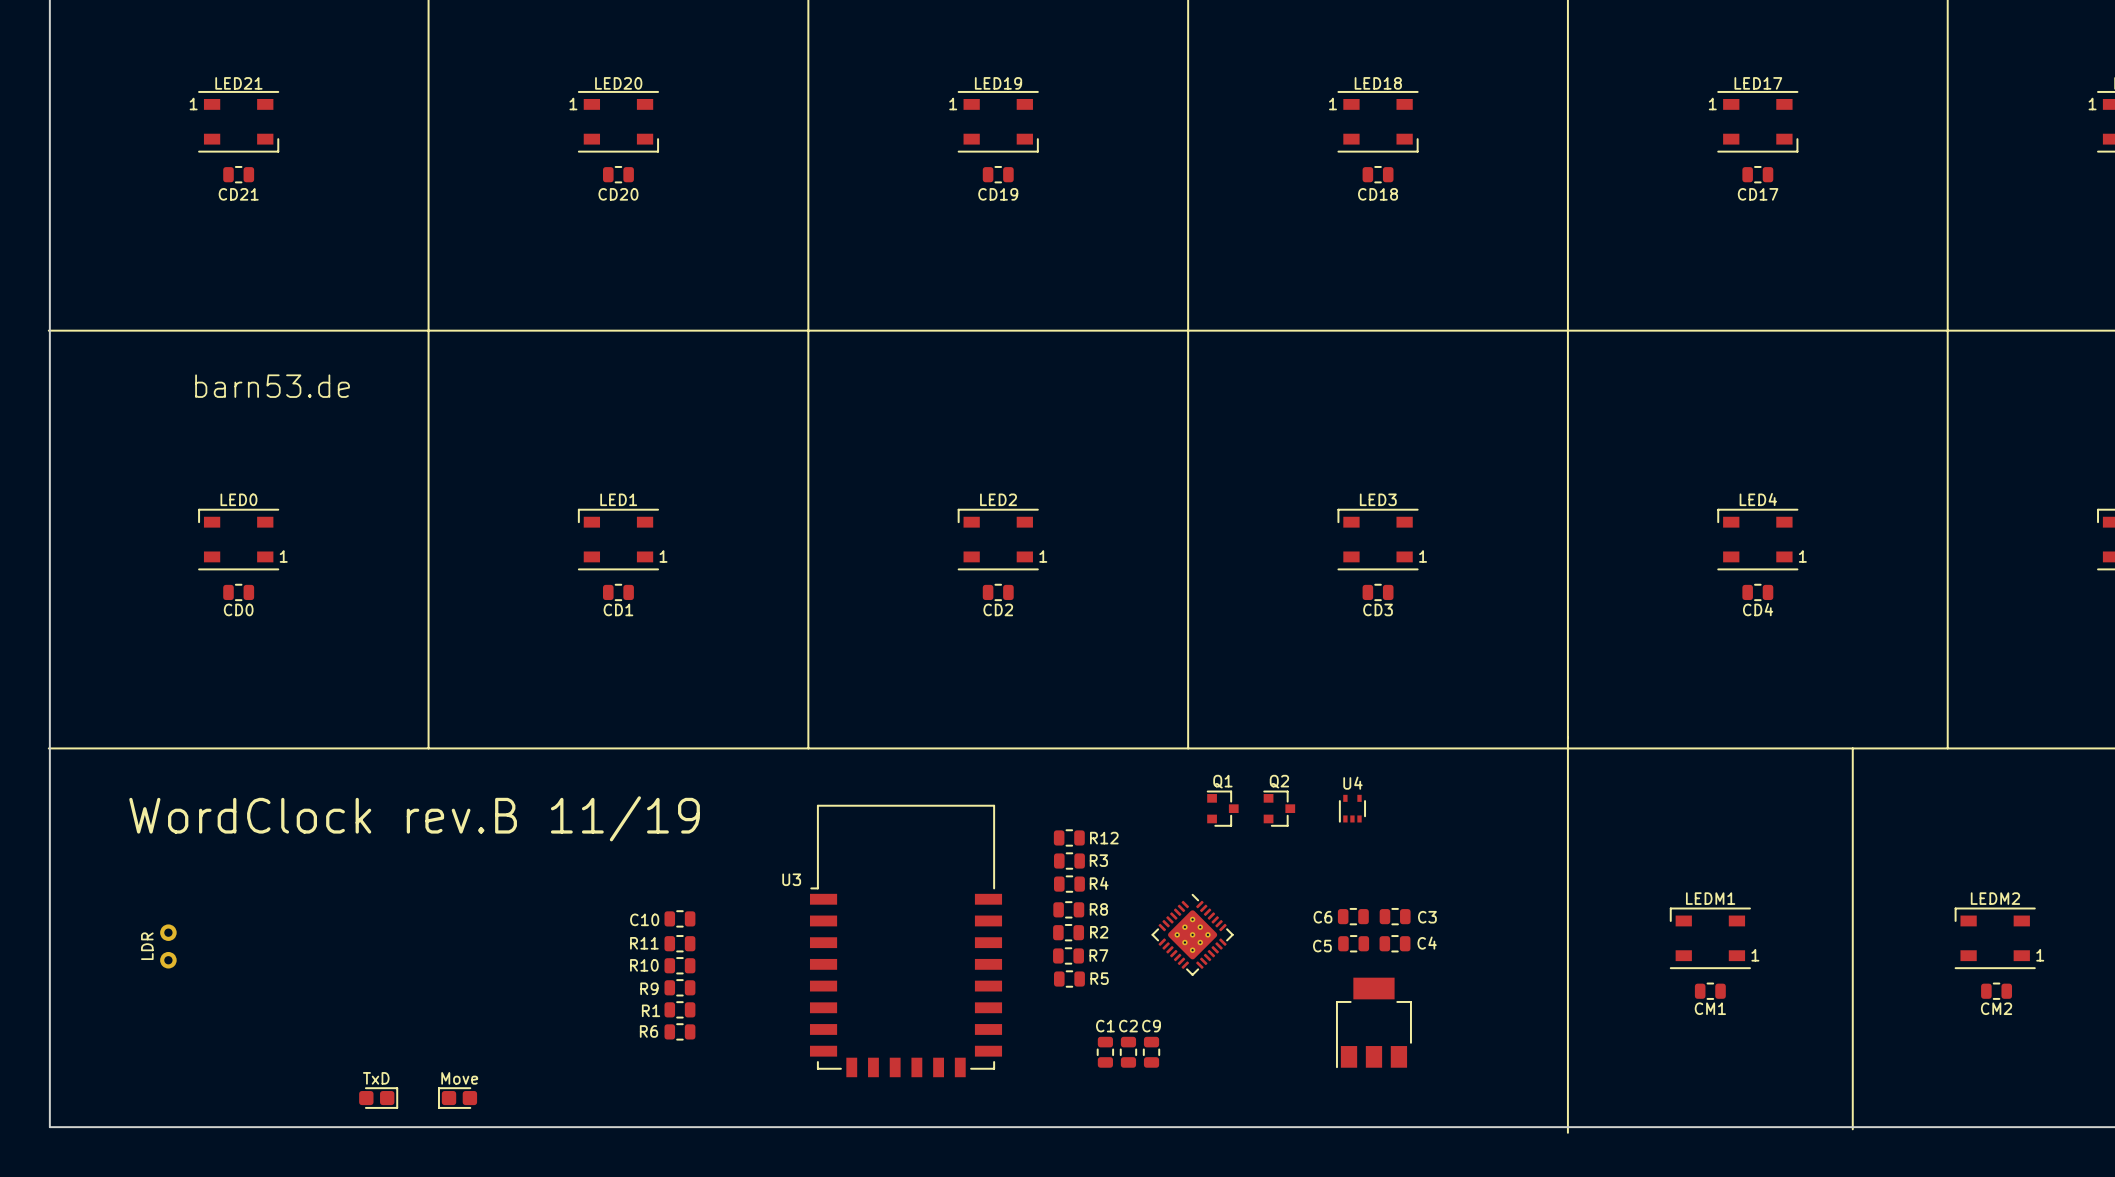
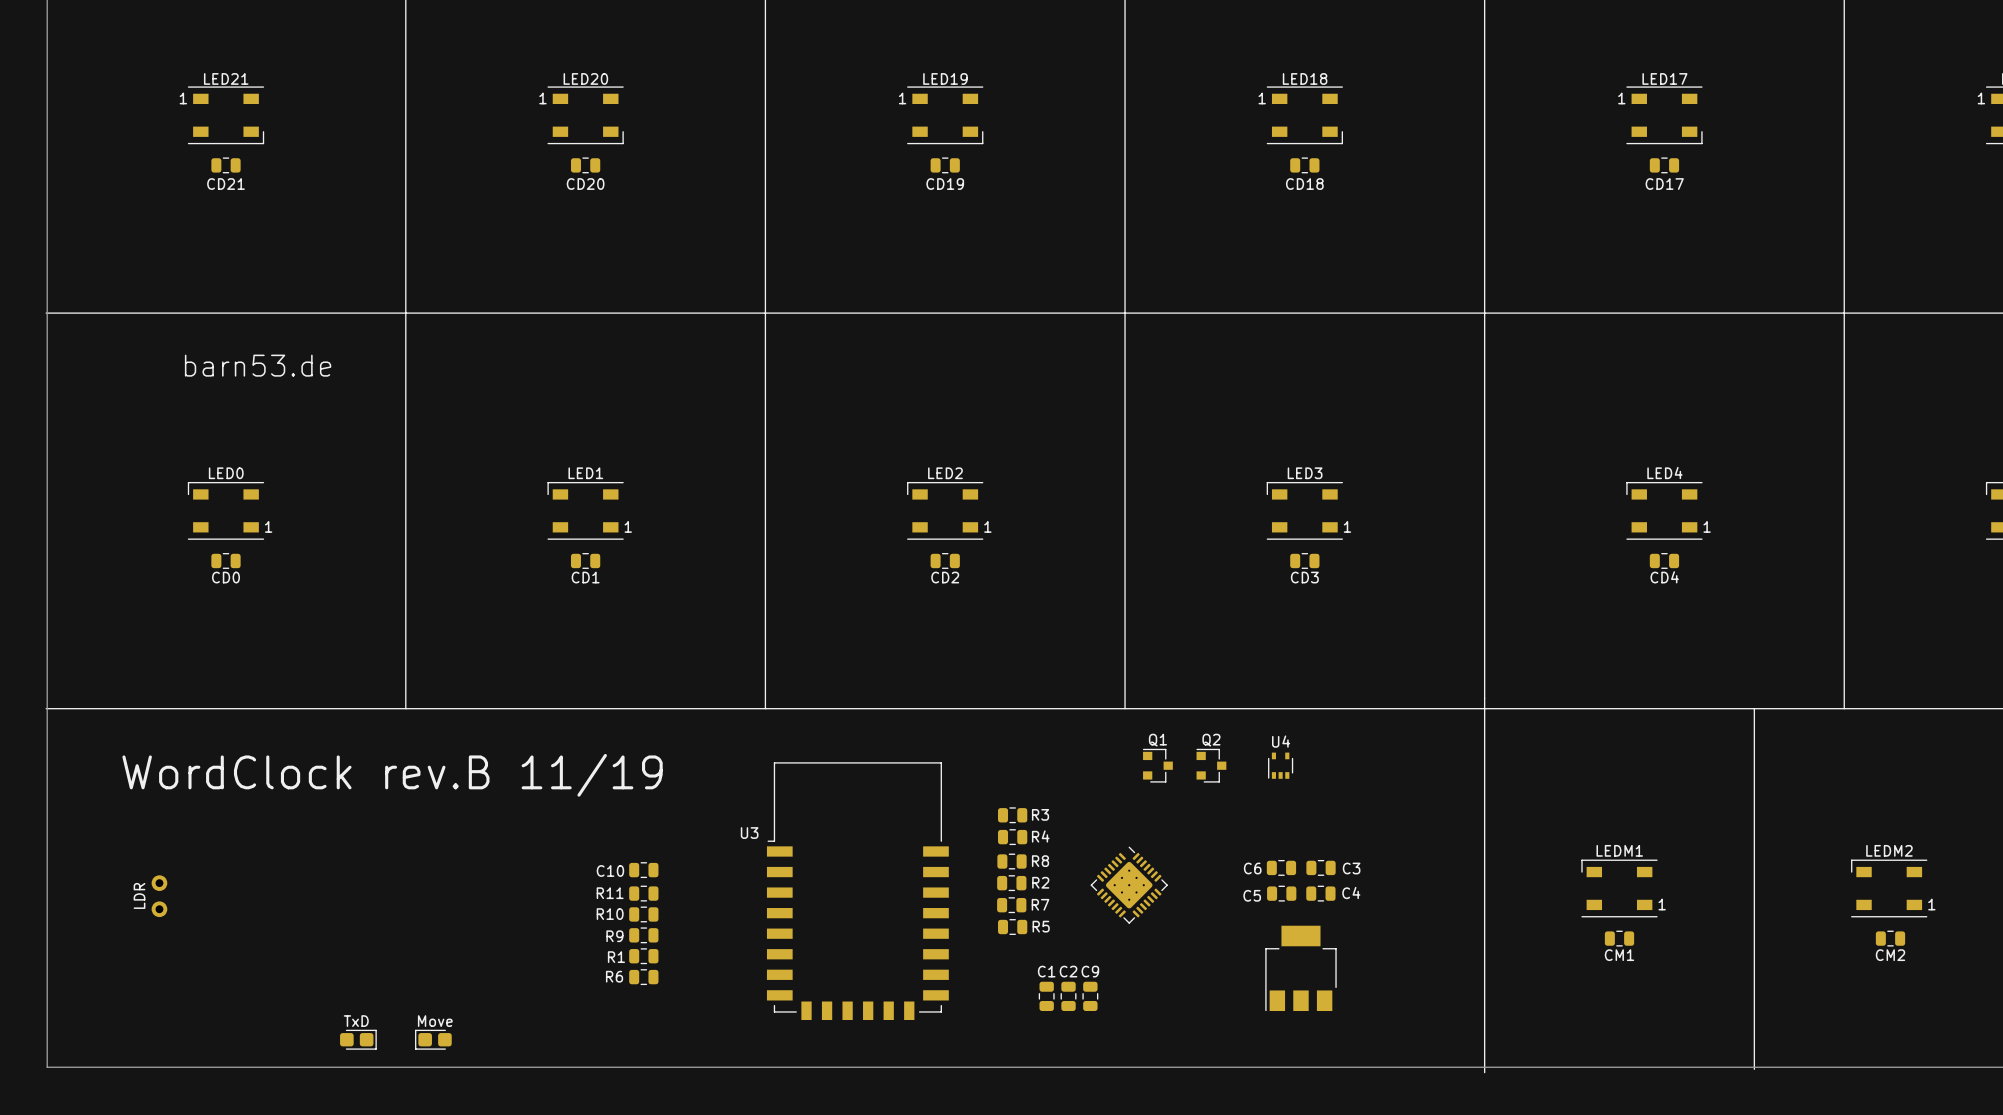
R12: (1069, 837) -> none

